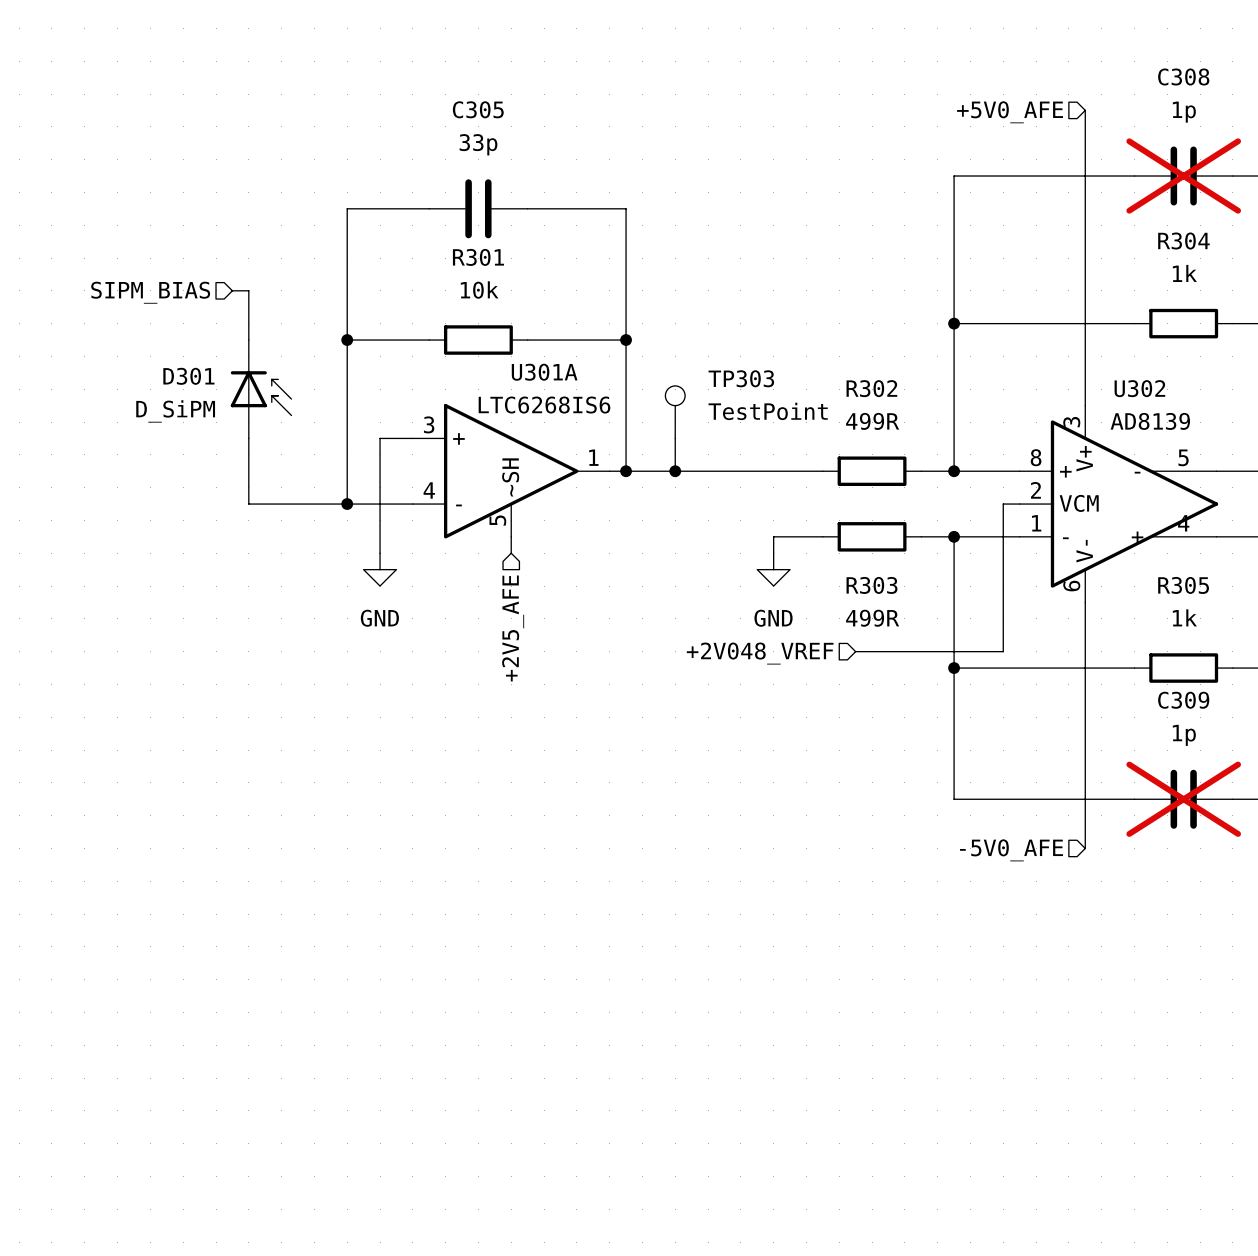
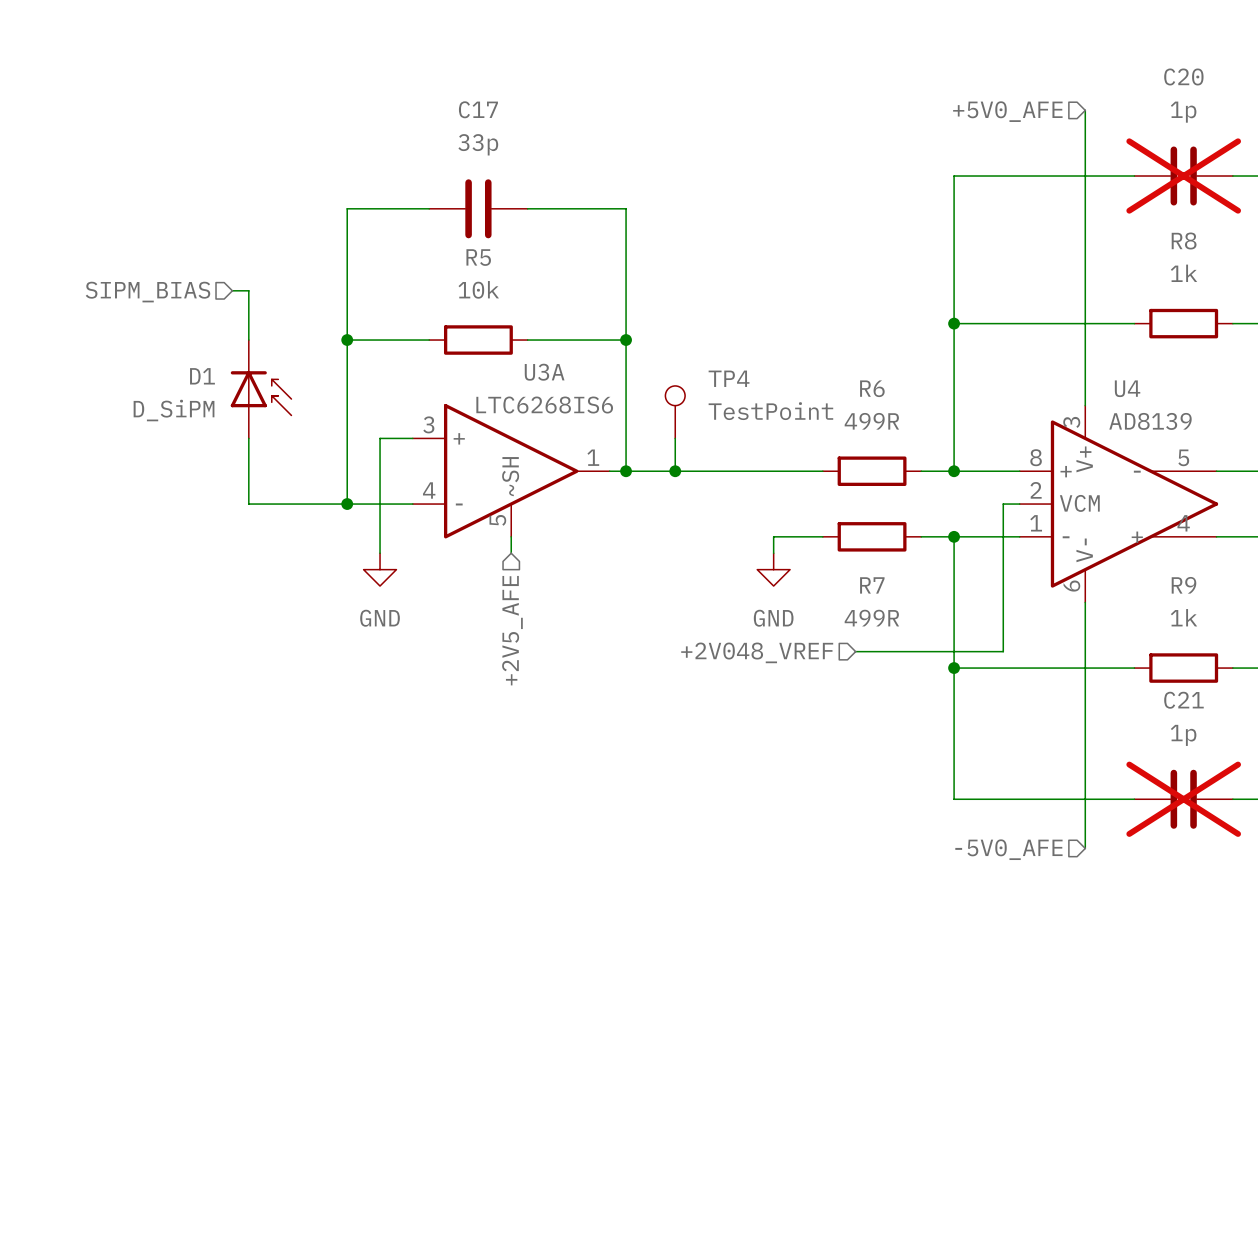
C308 name: C308 (1183, 76) -> C20 (1183, 76)
C305 name: C305 (478, 109) -> C17 (478, 109)
R304 name: R304 (1183, 241) -> R8 (1184, 241)
R301 name: R301 (478, 257) -> R5 (478, 257)
U301A name: U301A (544, 372) -> U3A (544, 372)
D301 name: D301 (188, 376) -> D1 (202, 376)
TP303 name: TP303 (741, 378) -> TP4 (729, 378)
R302 name: R302 (871, 388) -> R6 (872, 388)
U302 name: U302 (1139, 388) -> U4 (1127, 388)
R303 name: R303 (872, 585) -> R7 (872, 585)
R305 name: R305 (1183, 585) -> R9 (1184, 585)
C309 name: C309 (1183, 700) -> C21 (1183, 700)

